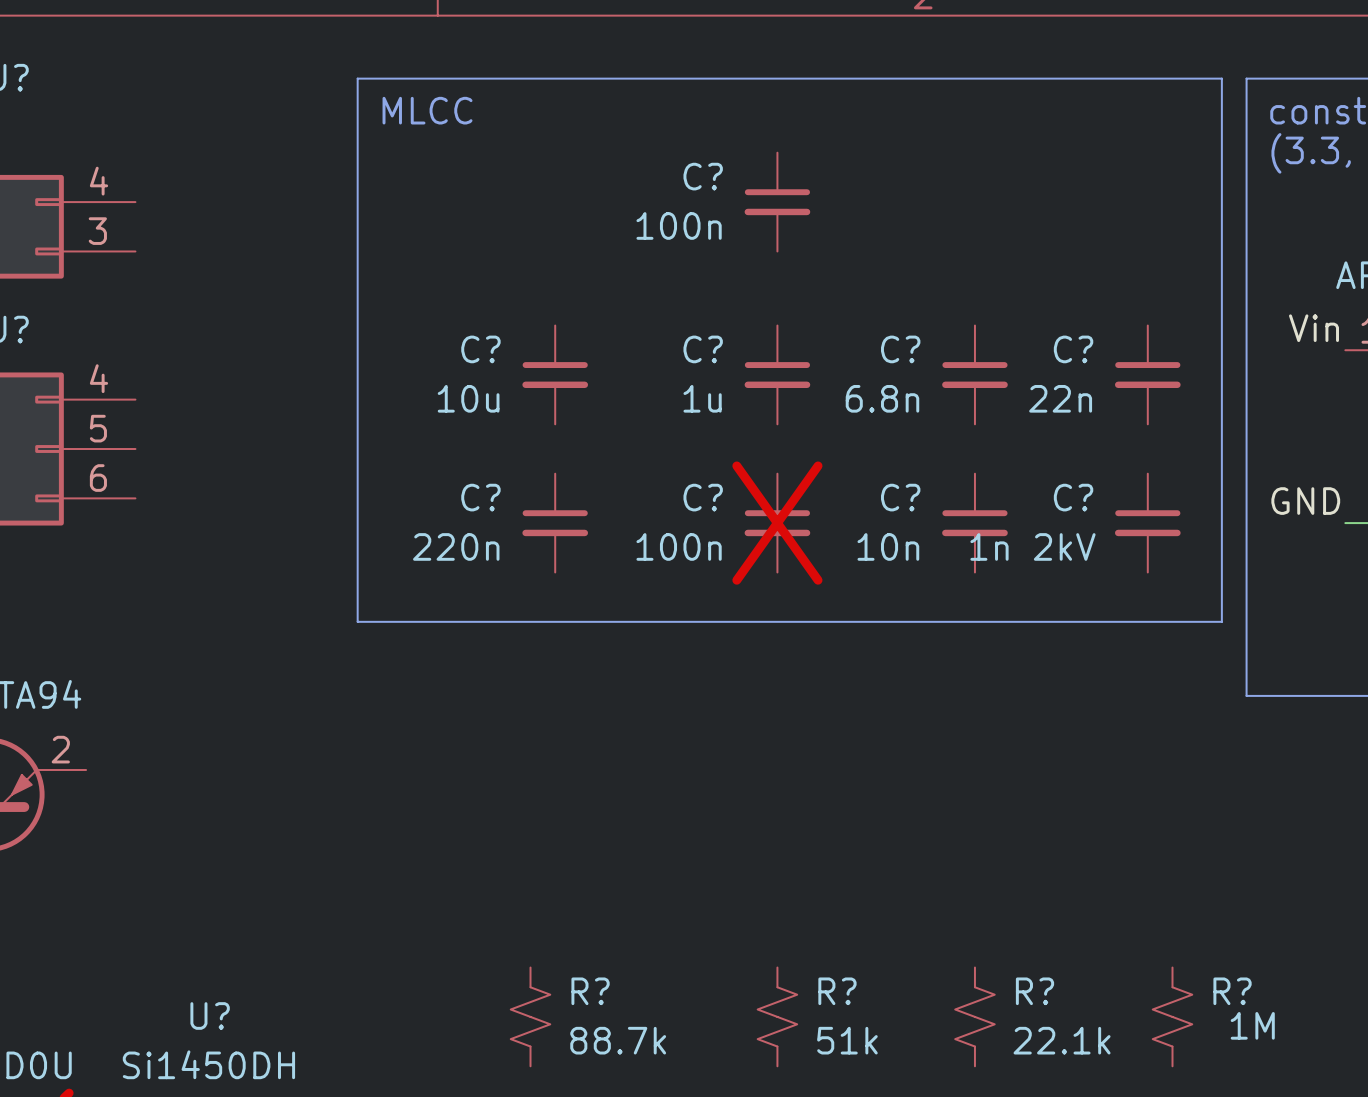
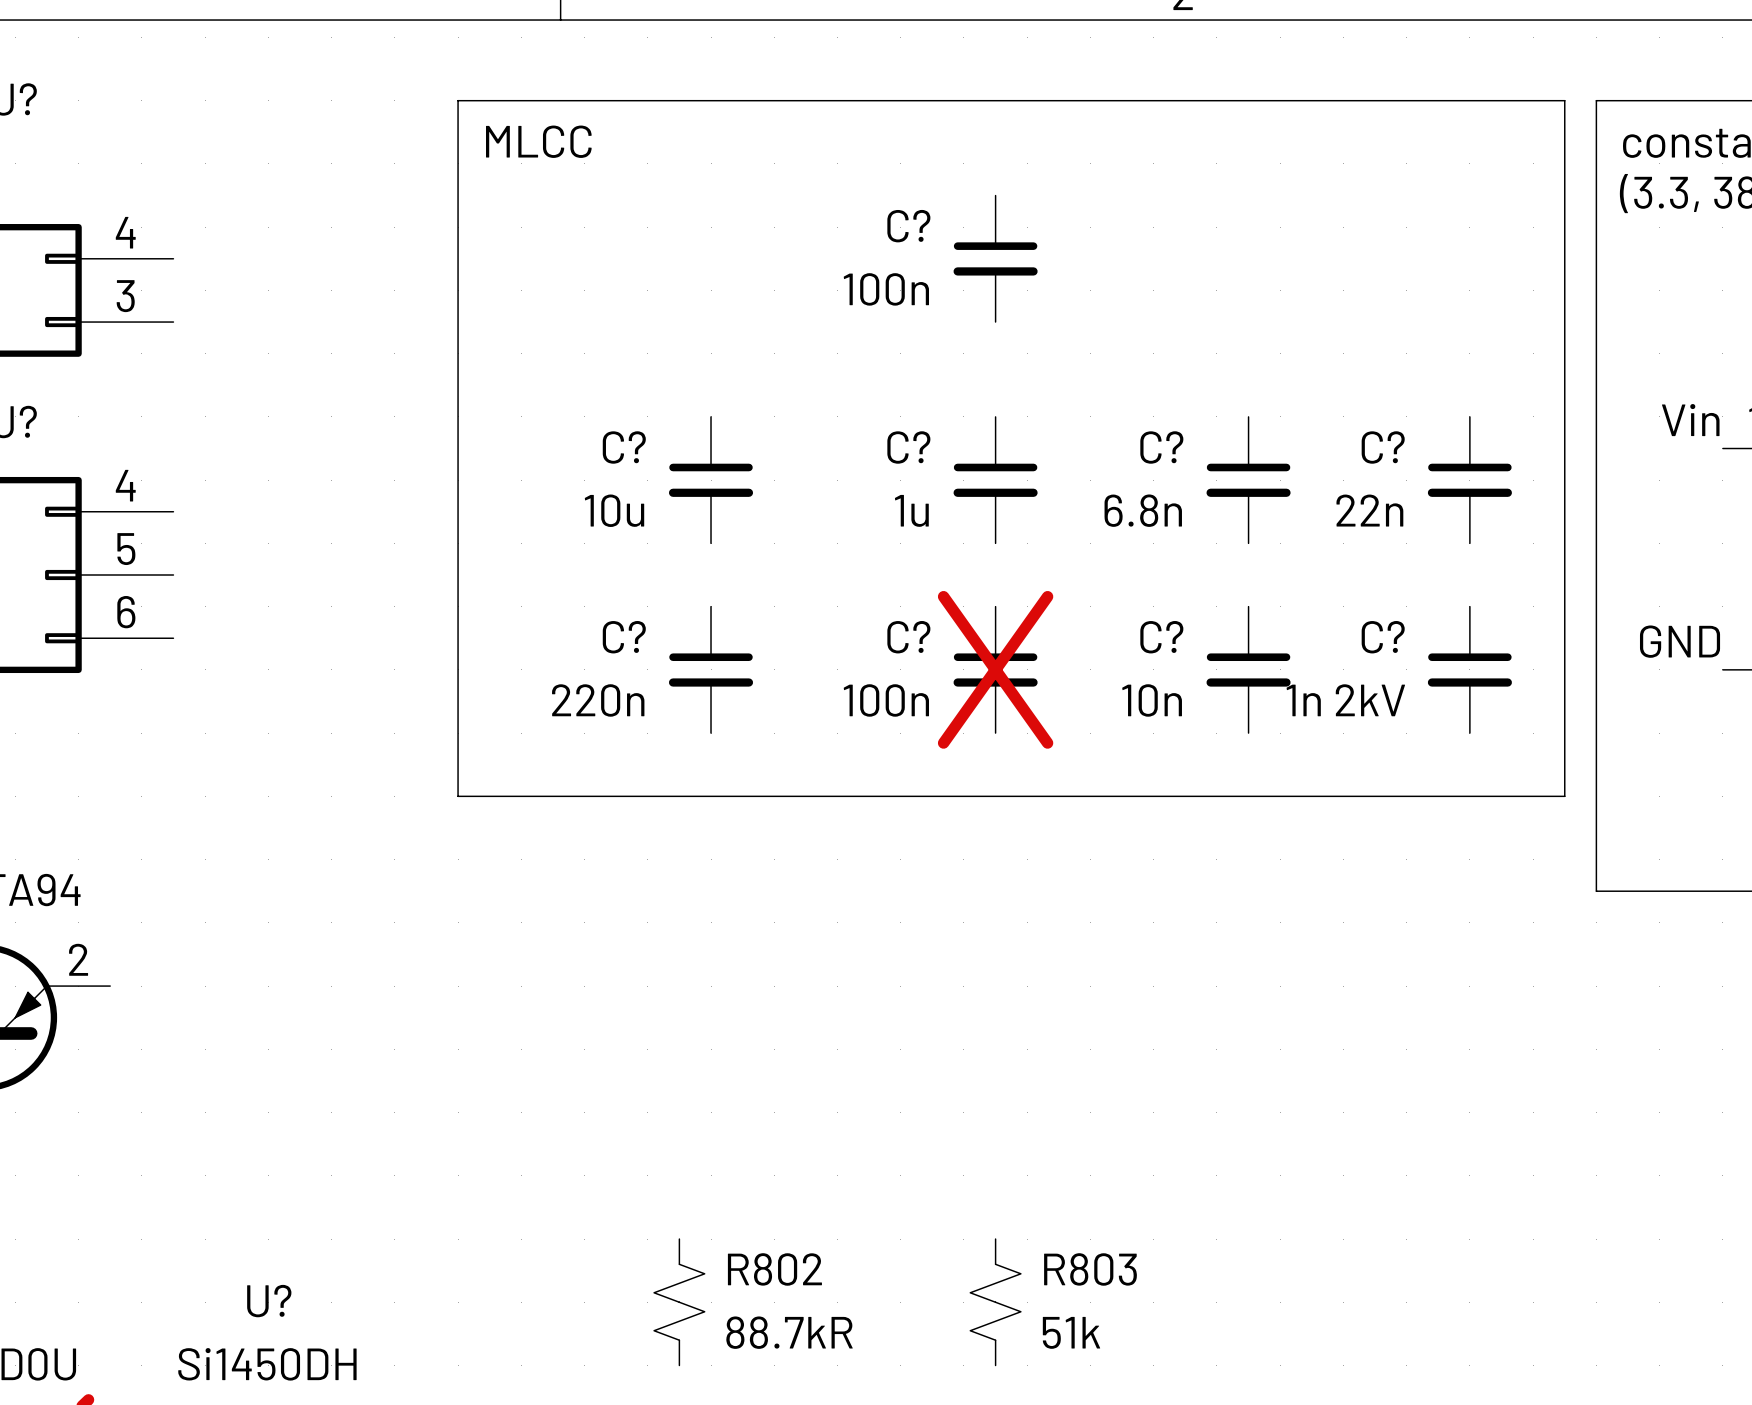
R? name: R? (590, 991) -> R802 (774, 1269)
R? name: R? (837, 991) -> R803 (1090, 1269)
R?: 22.1k (974, 1016) -> none
R?: 1M (1172, 1016) -> none
R? value: 88.7k (618, 1040) -> 88.7kR (789, 1332)

